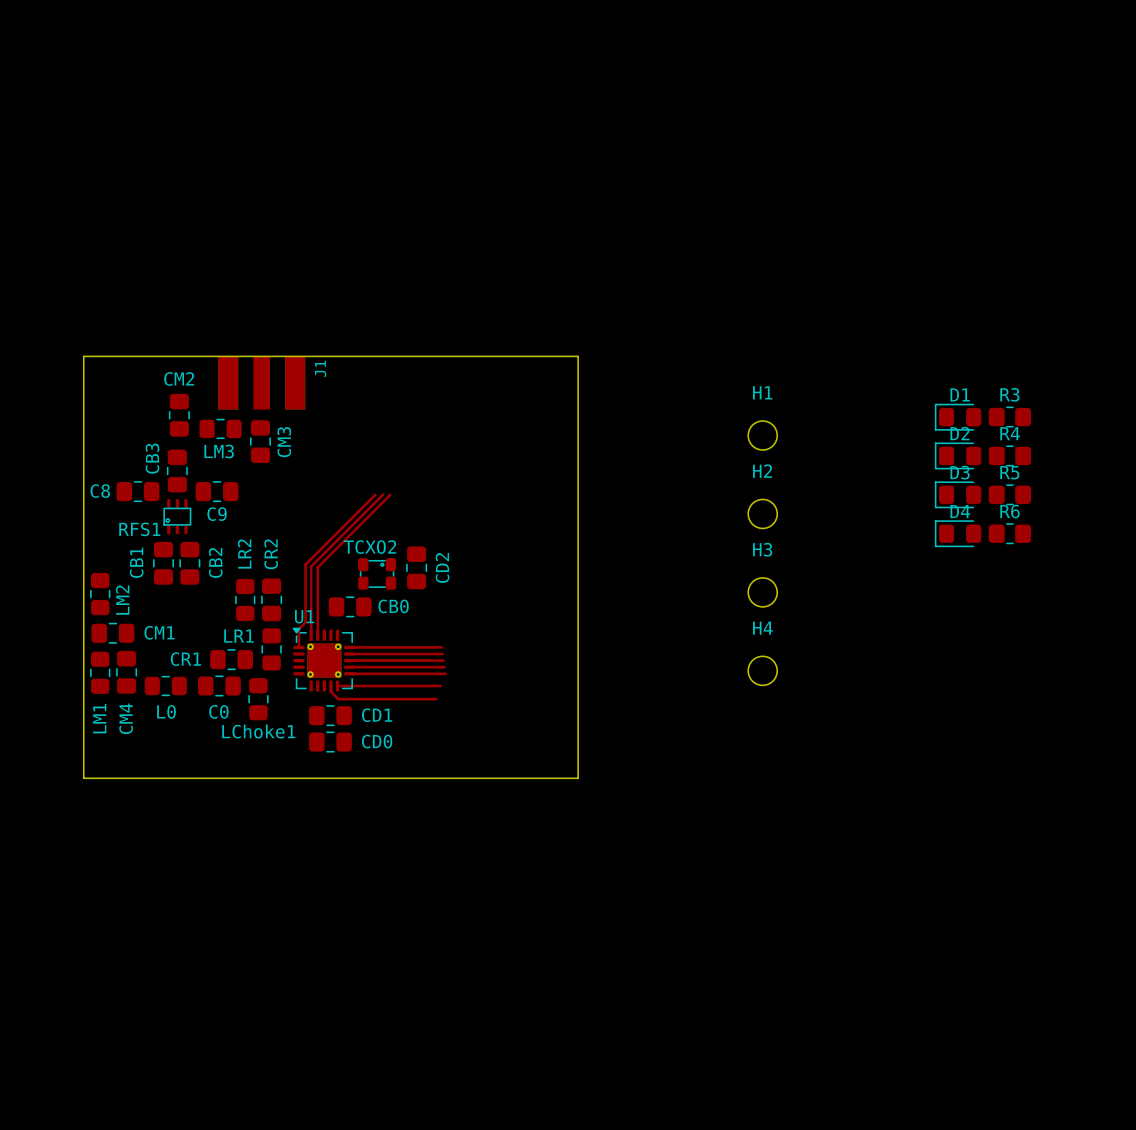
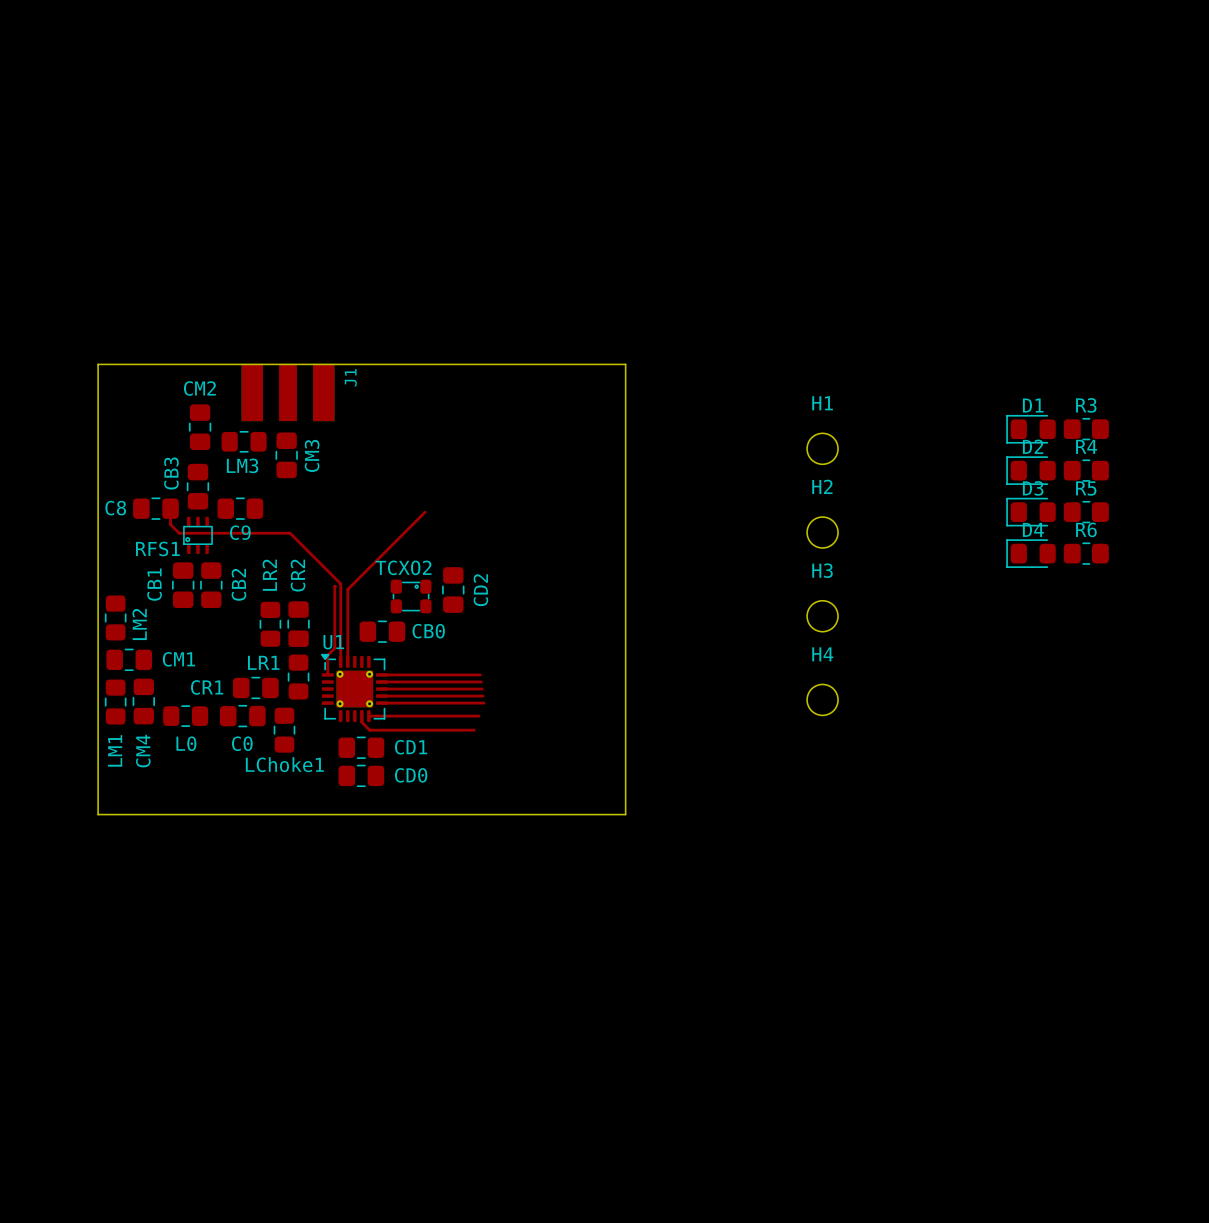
top track: (375, 494) (305, 564) -> none
top track: (383, 494) (311, 566) -> (170, 508) (170, 524) (179, 533) (290, 533) (340, 583) (340, 588)

